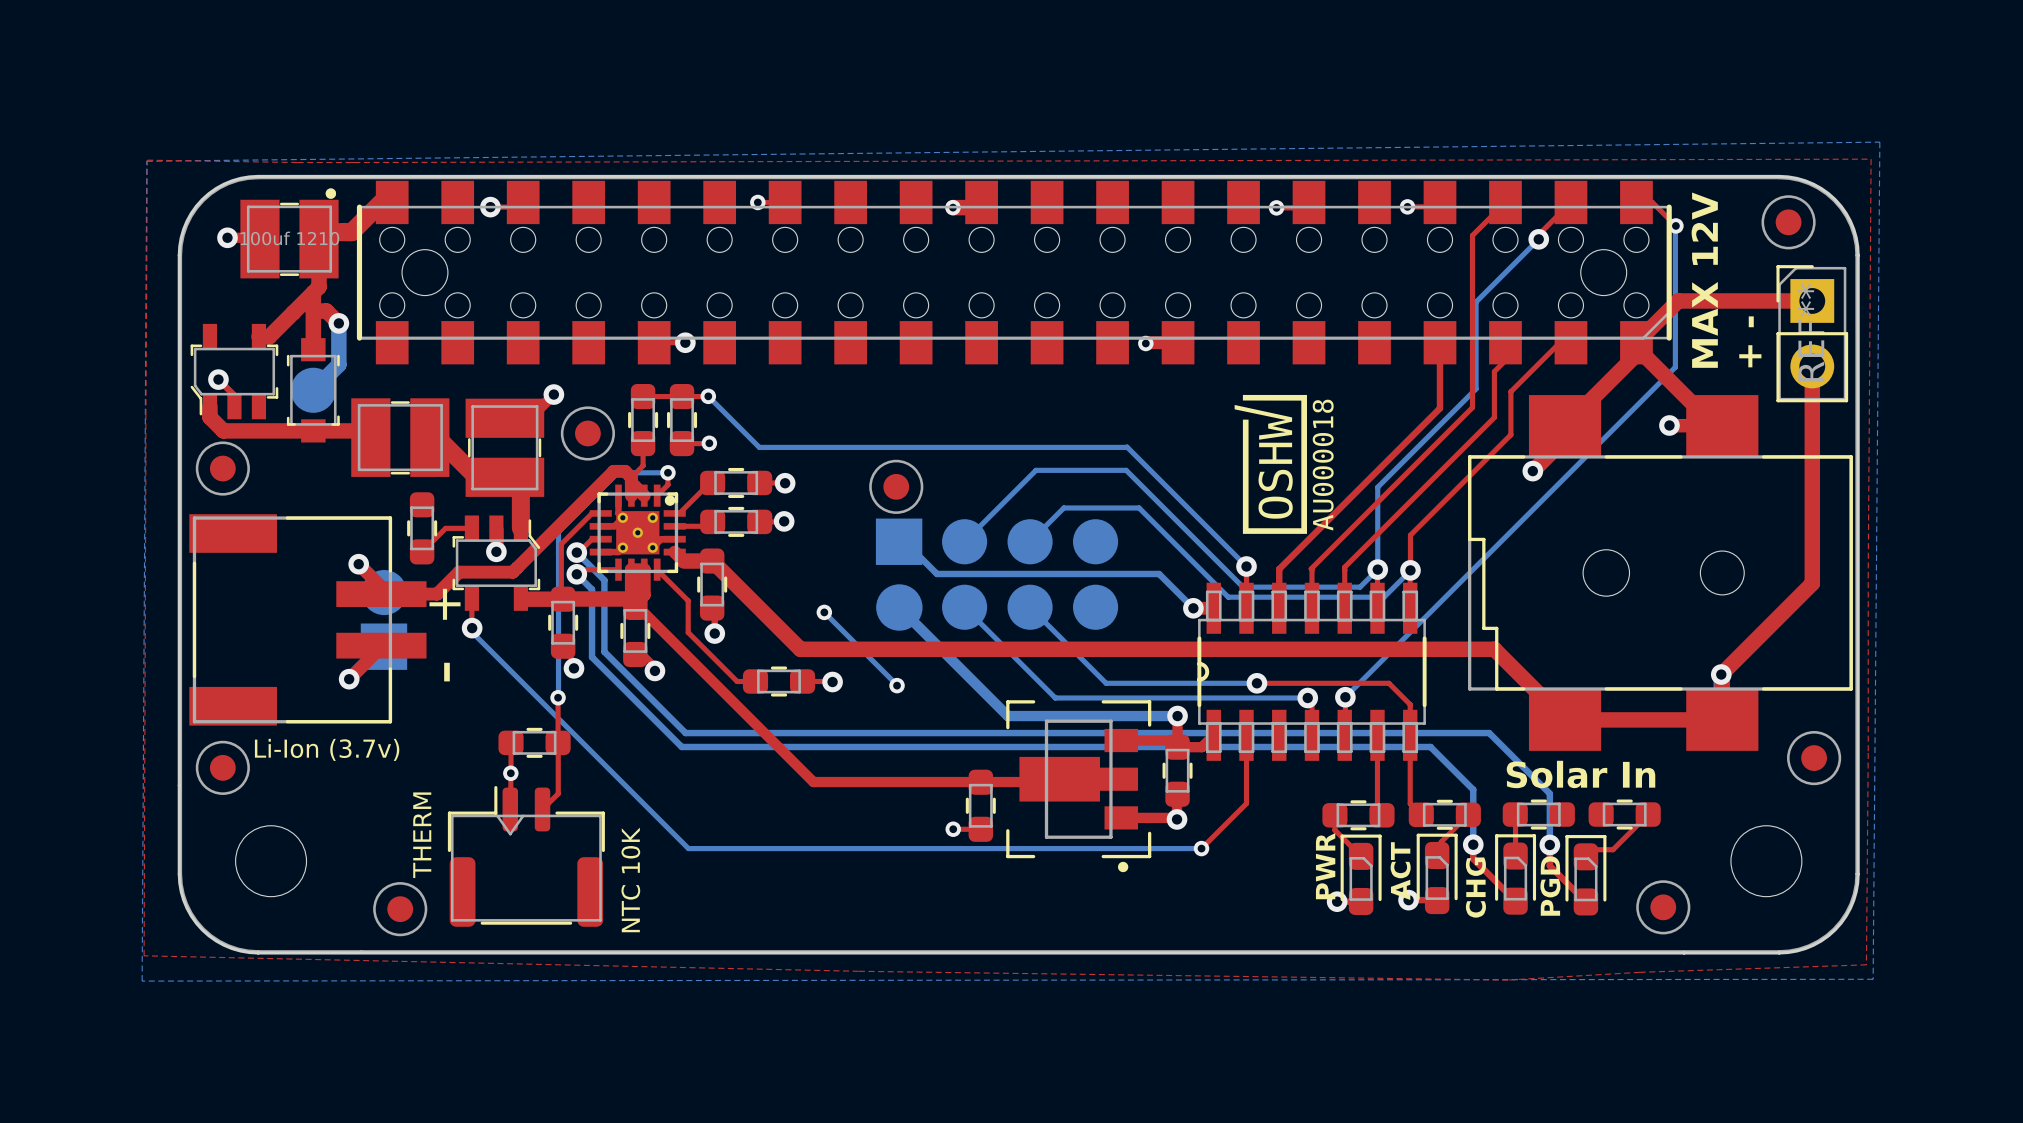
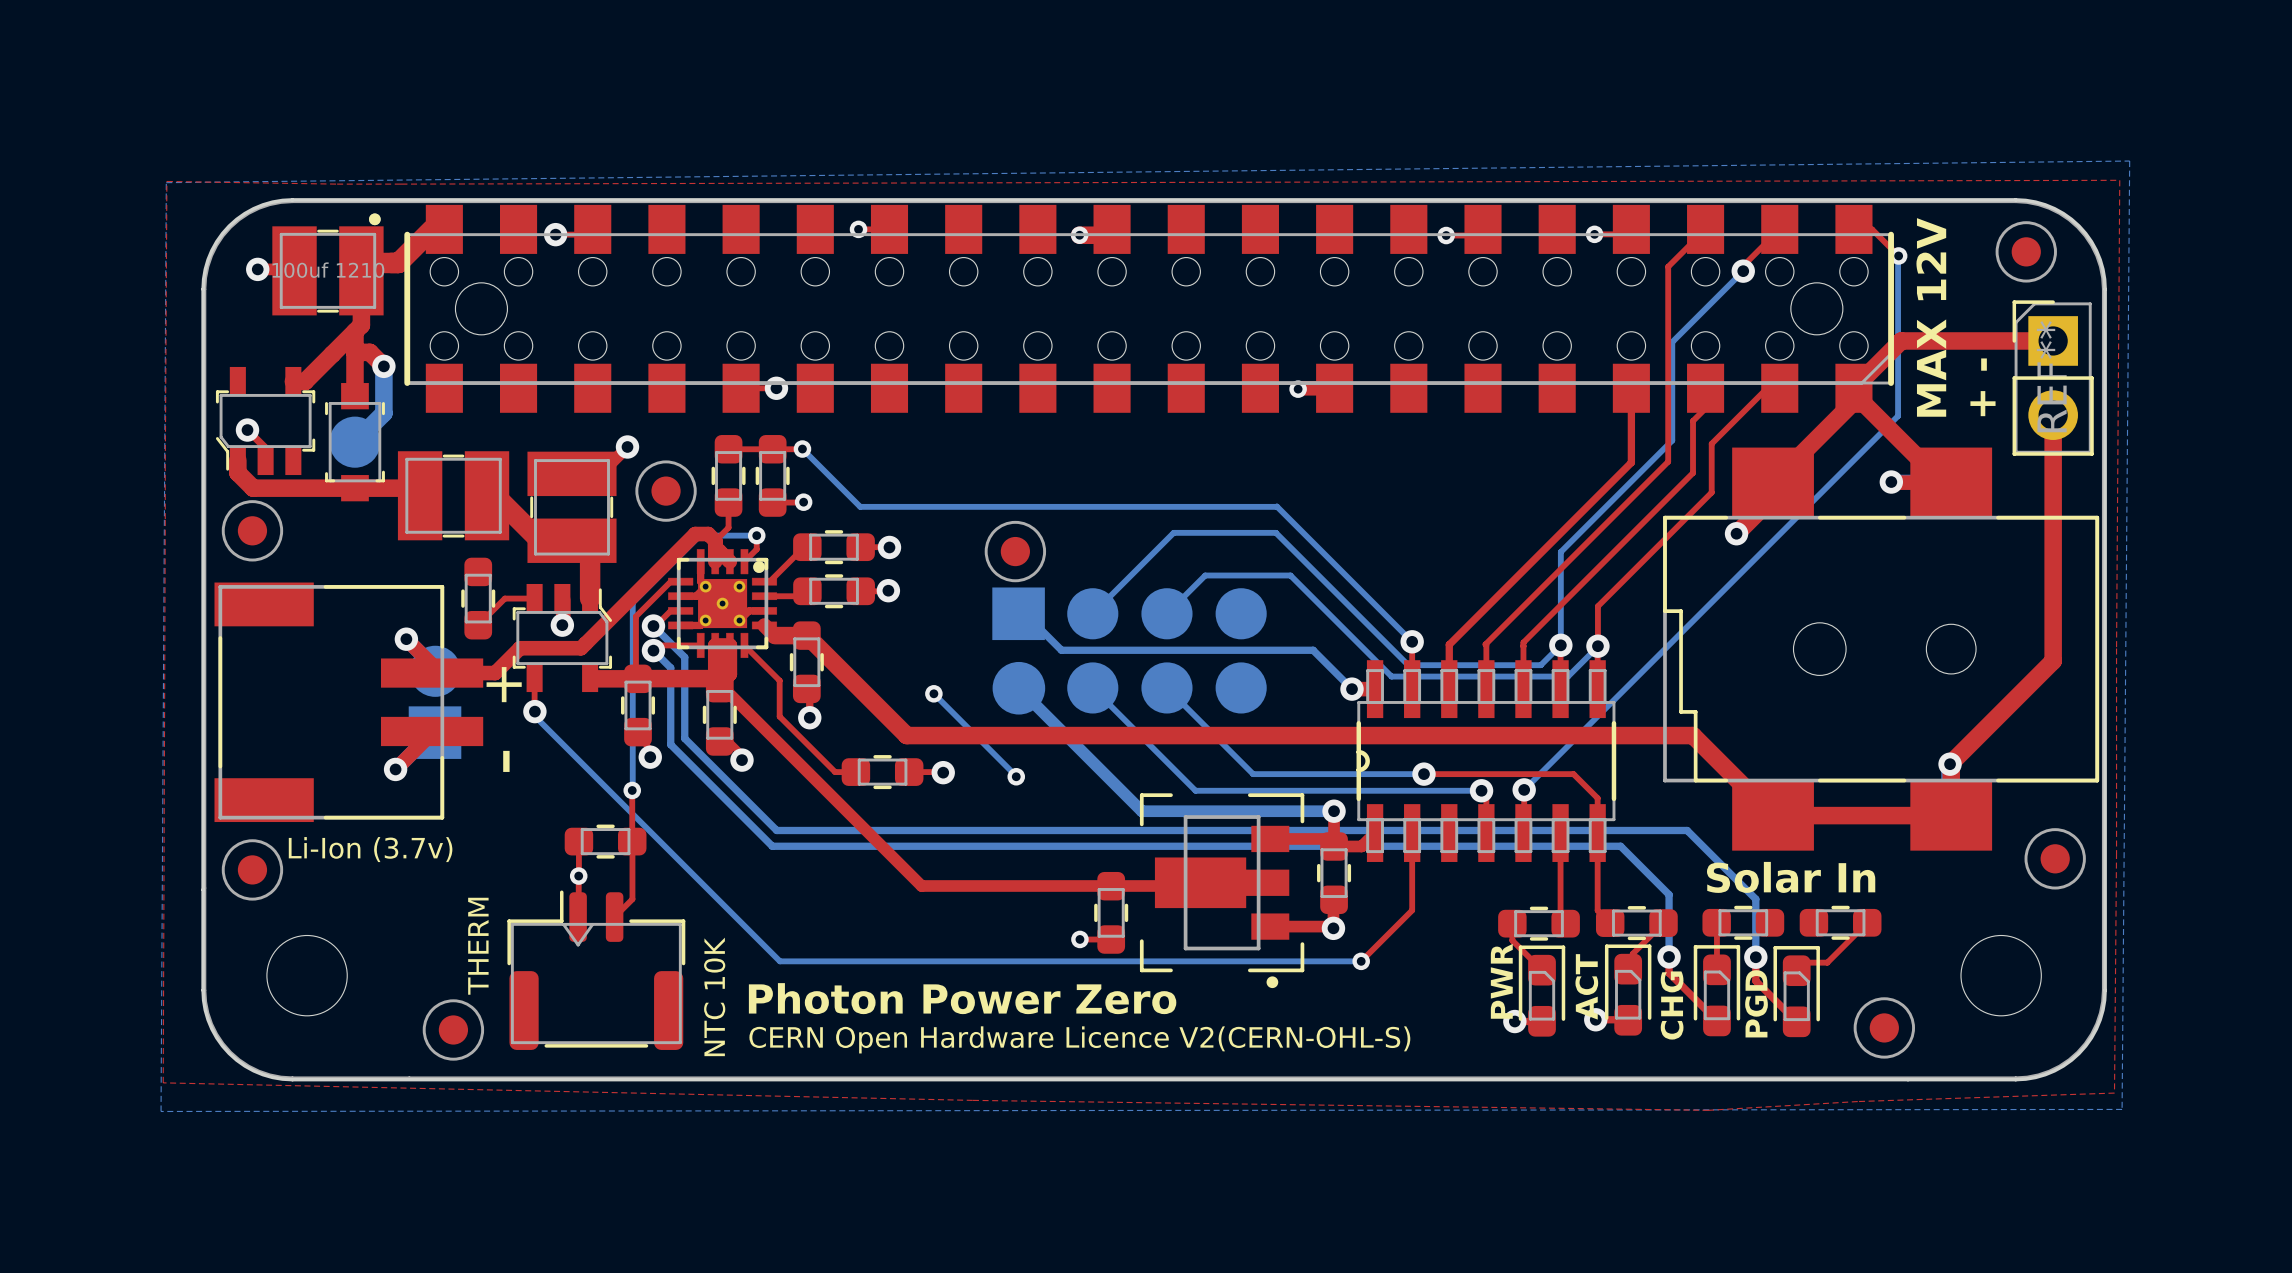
drawing: [1234, 394, 1334, 534] -> none
text: none -> Photon Power Zero (962, 998)
text: none -> CERN Open Hardware Licence V2(CERN-OHL-S) (1079, 1039)

